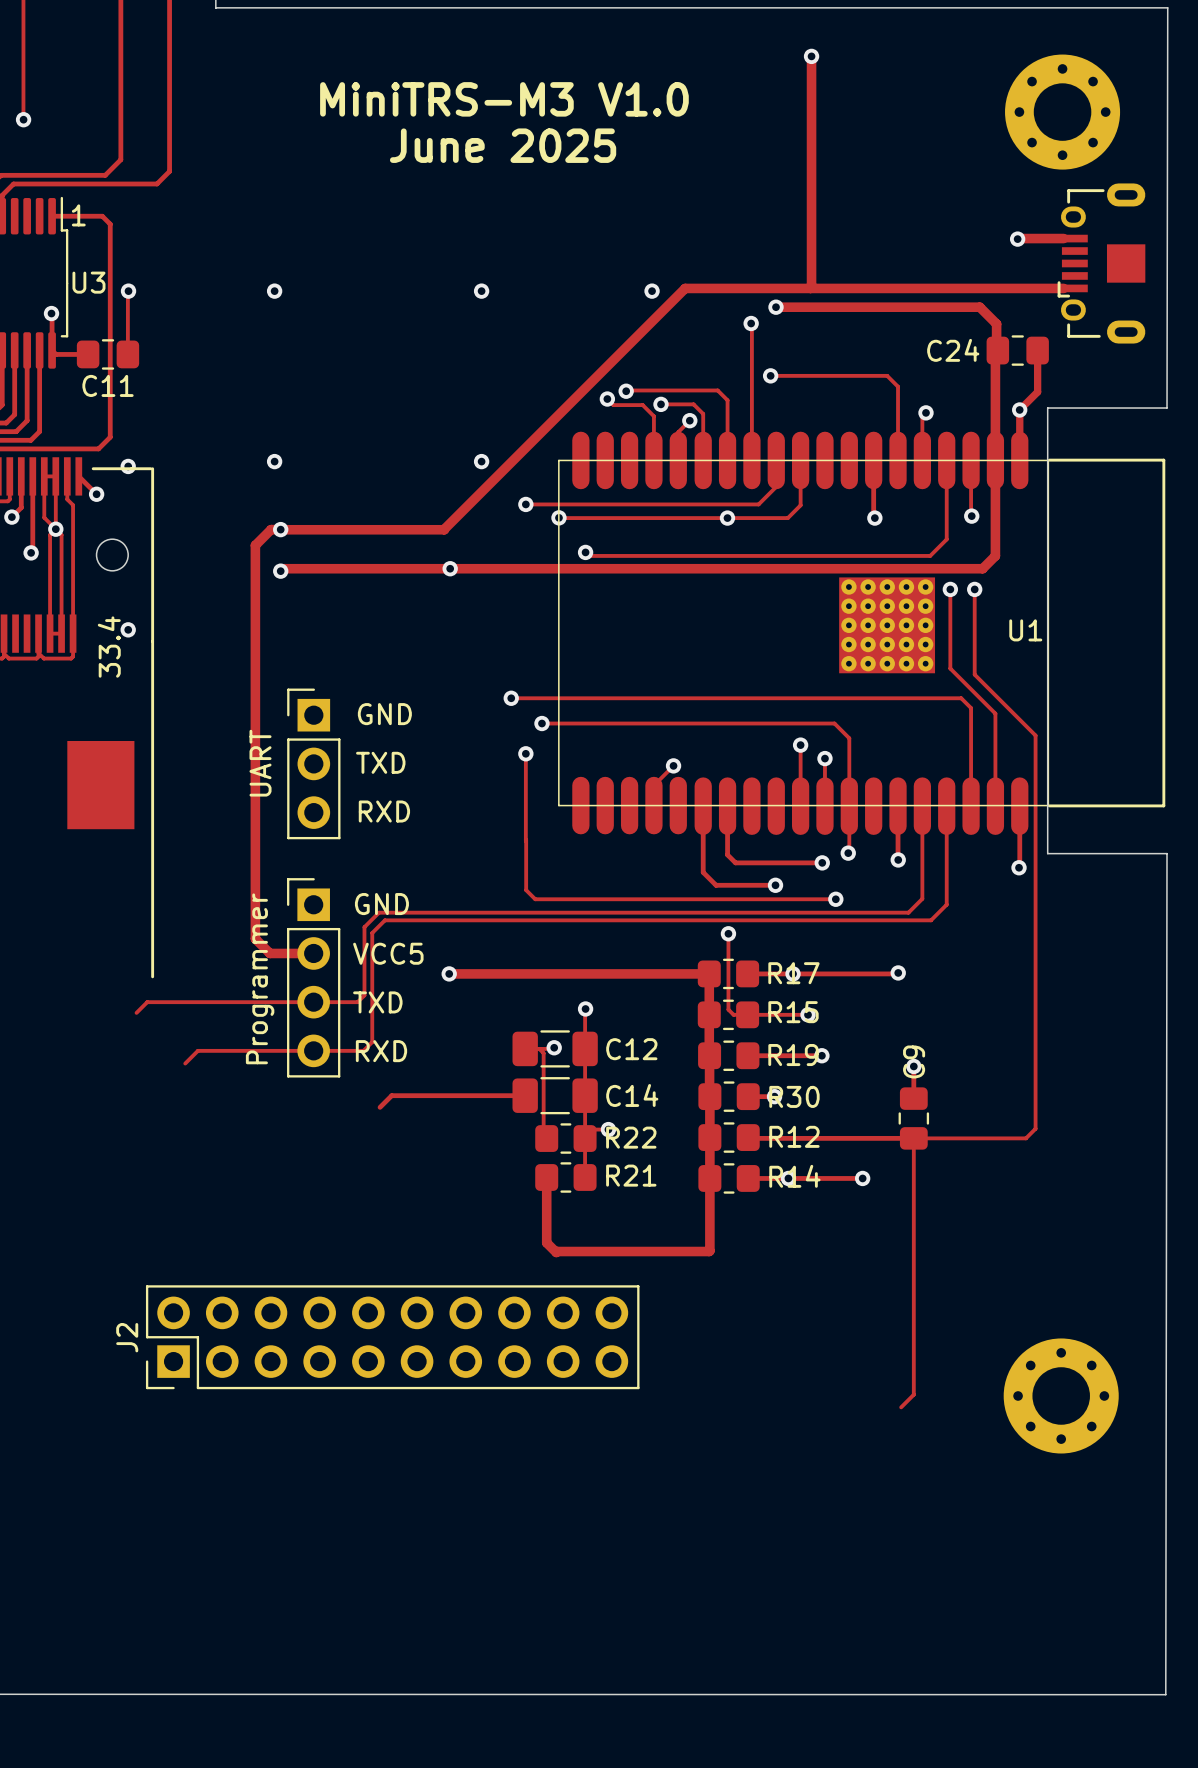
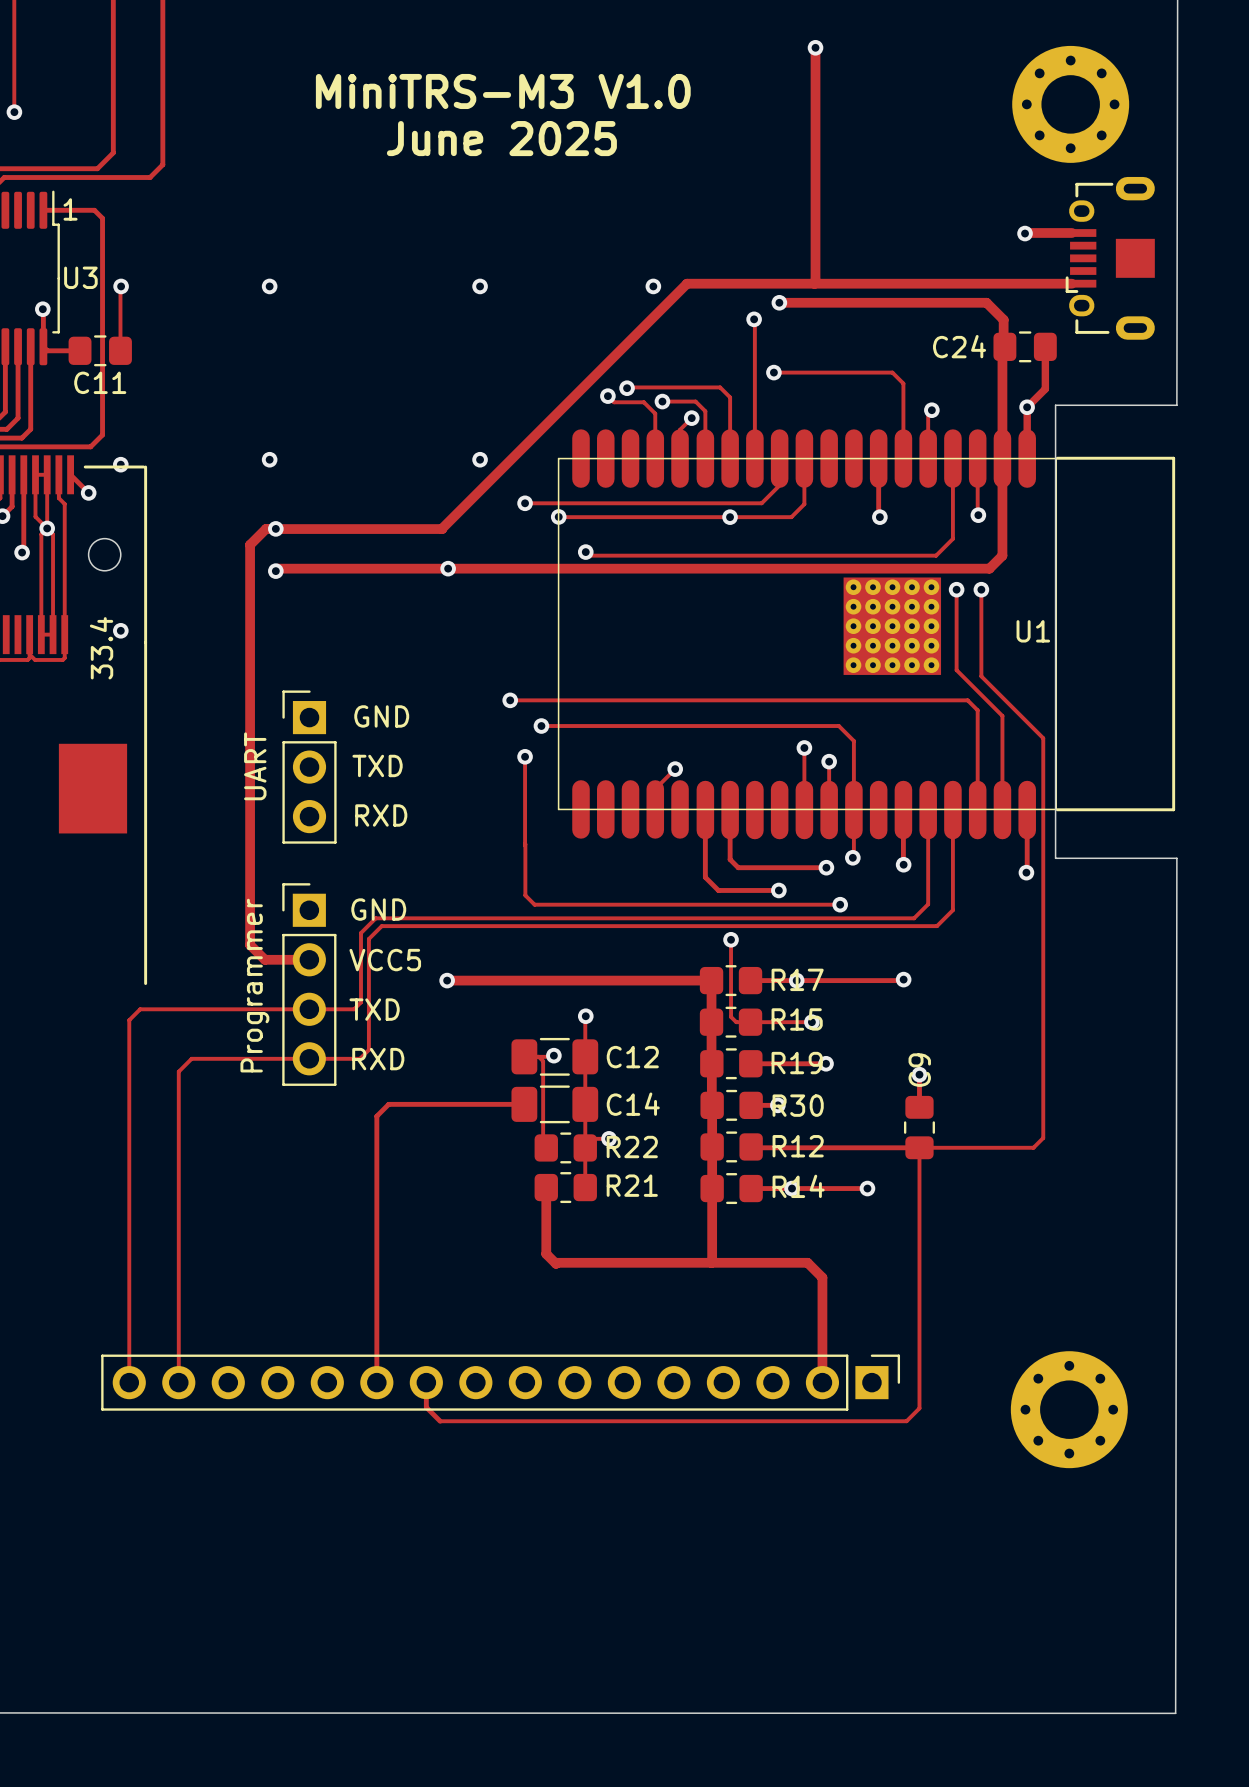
track: none -> (129, 1020) (129, 1382)
track: none -> (178, 1071) (178, 1382)
track: none -> (376, 1116) (376, 1383)
track: none -> (711, 1262) (807, 1262) (822, 1277) (822, 1383)
J2: (392, 1337) -> none
part: none -> (500, 1382)
track: none -> (426, 1383) (426, 1407) (440, 1421) (906, 1421)

